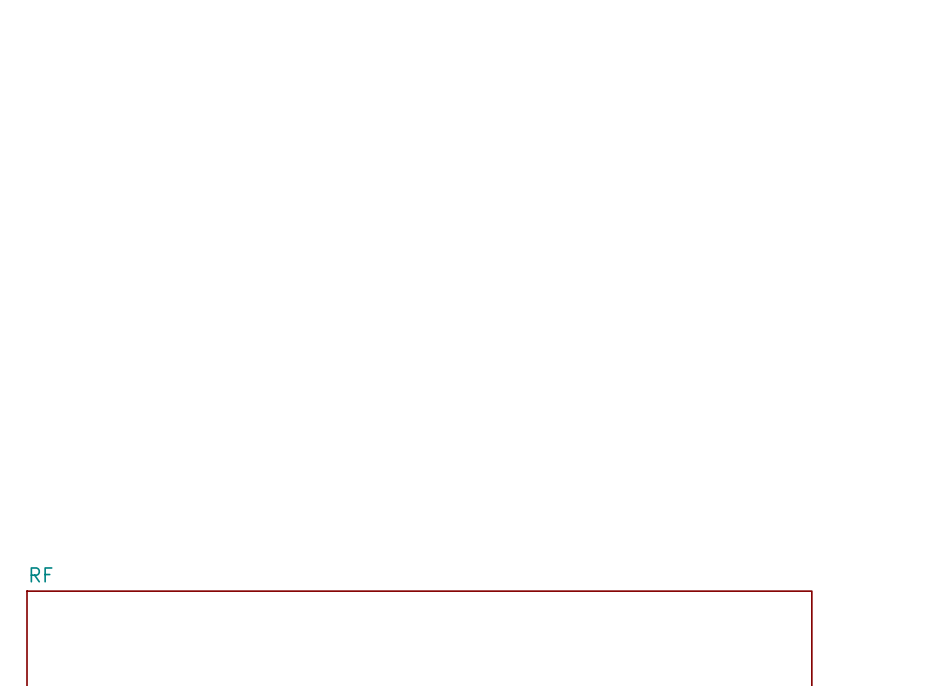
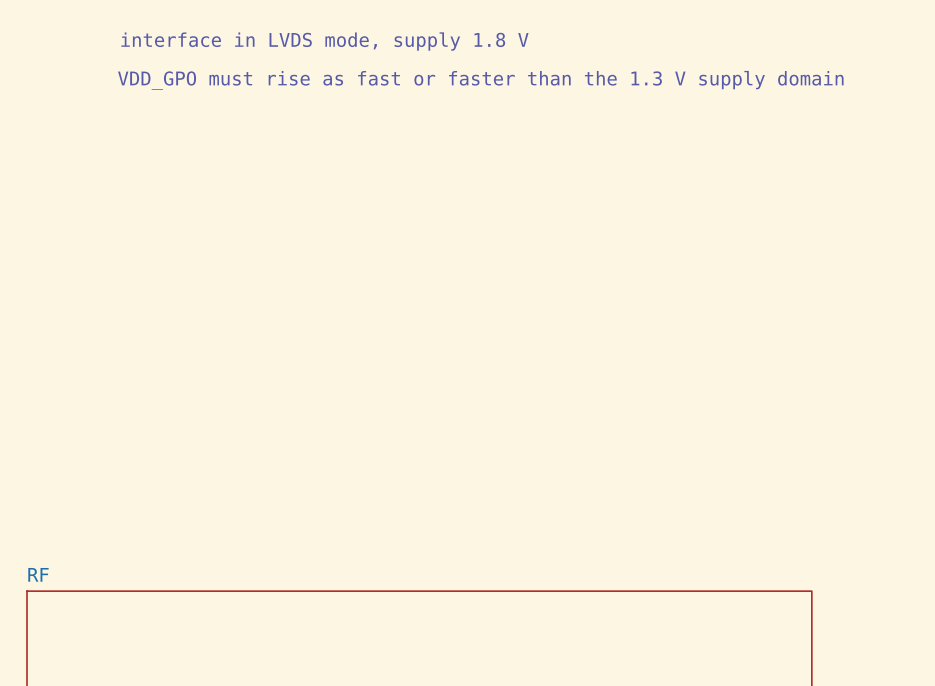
text: none -> interface in LVDS mode, supply 1.8 V (324, 41)
text: none -> VDD_GPO must rise as fast or faster than the 1.3 V supply domain (480, 80)

